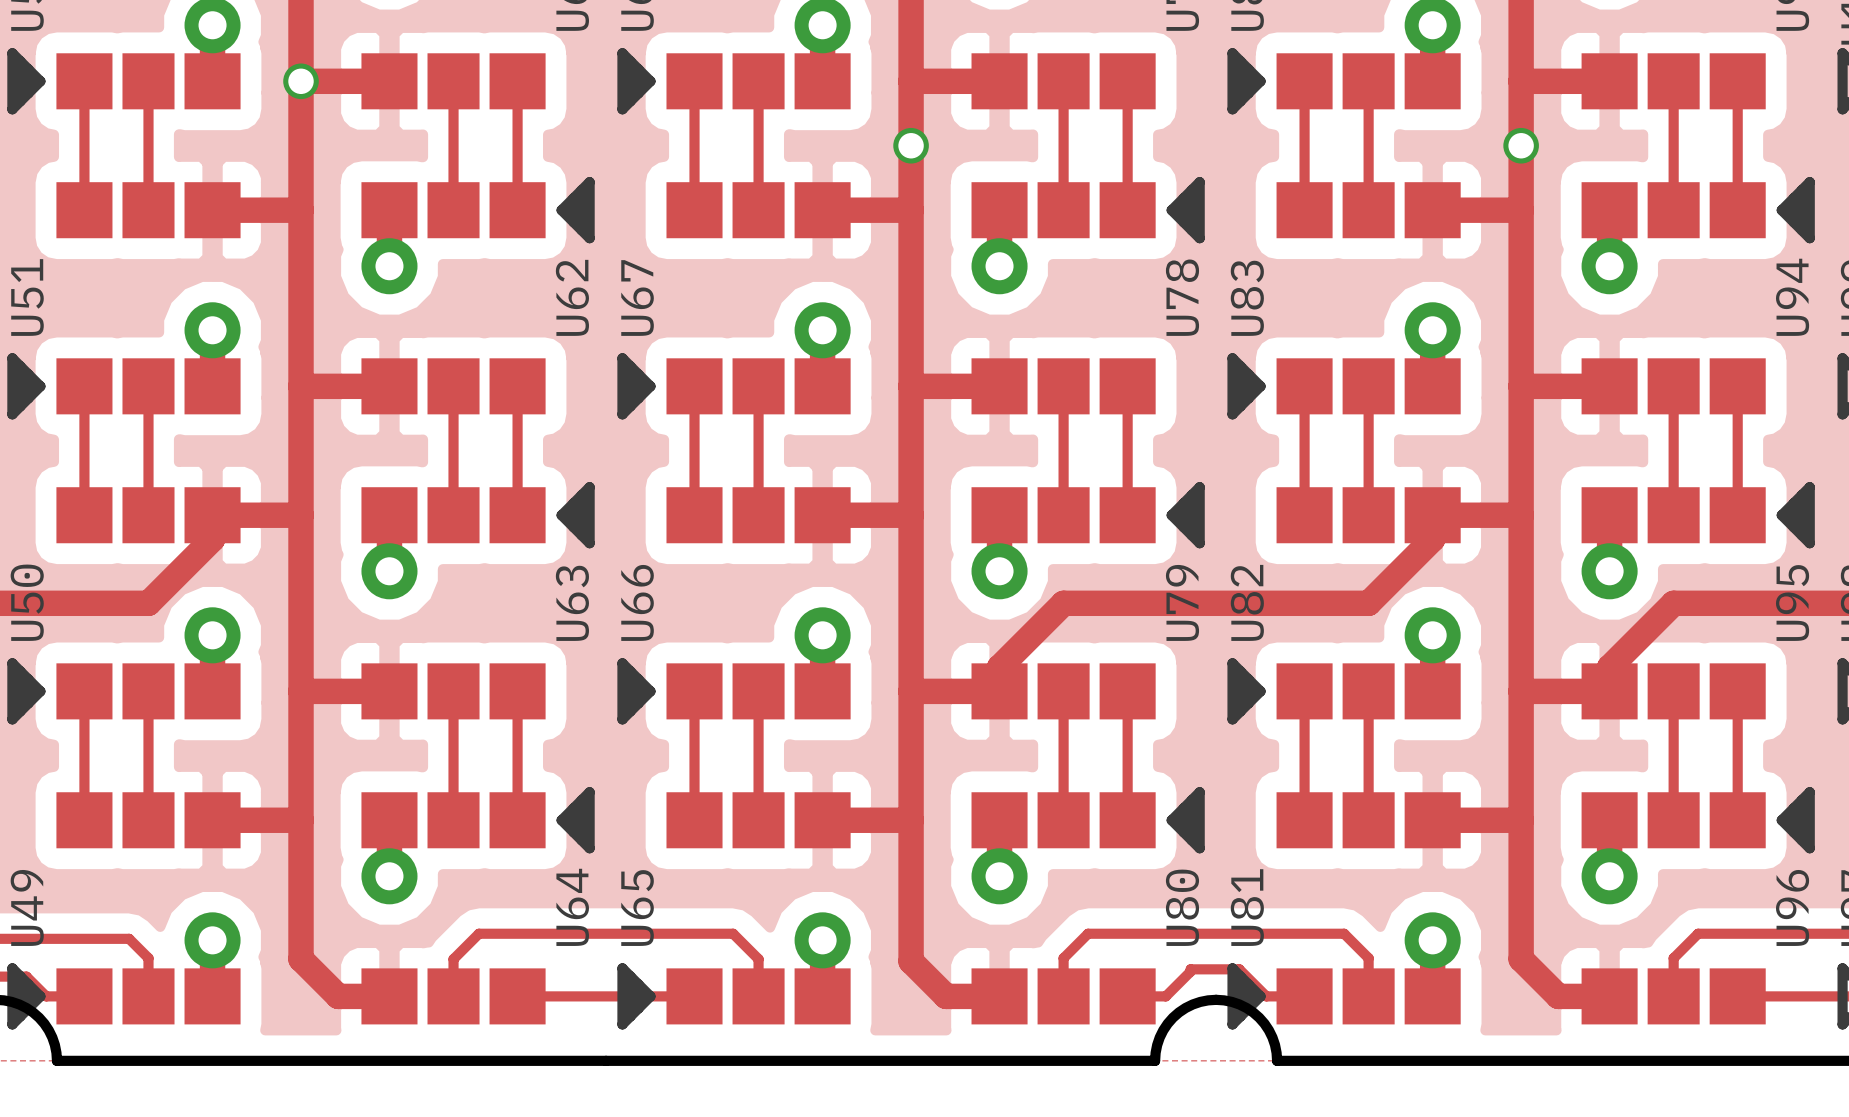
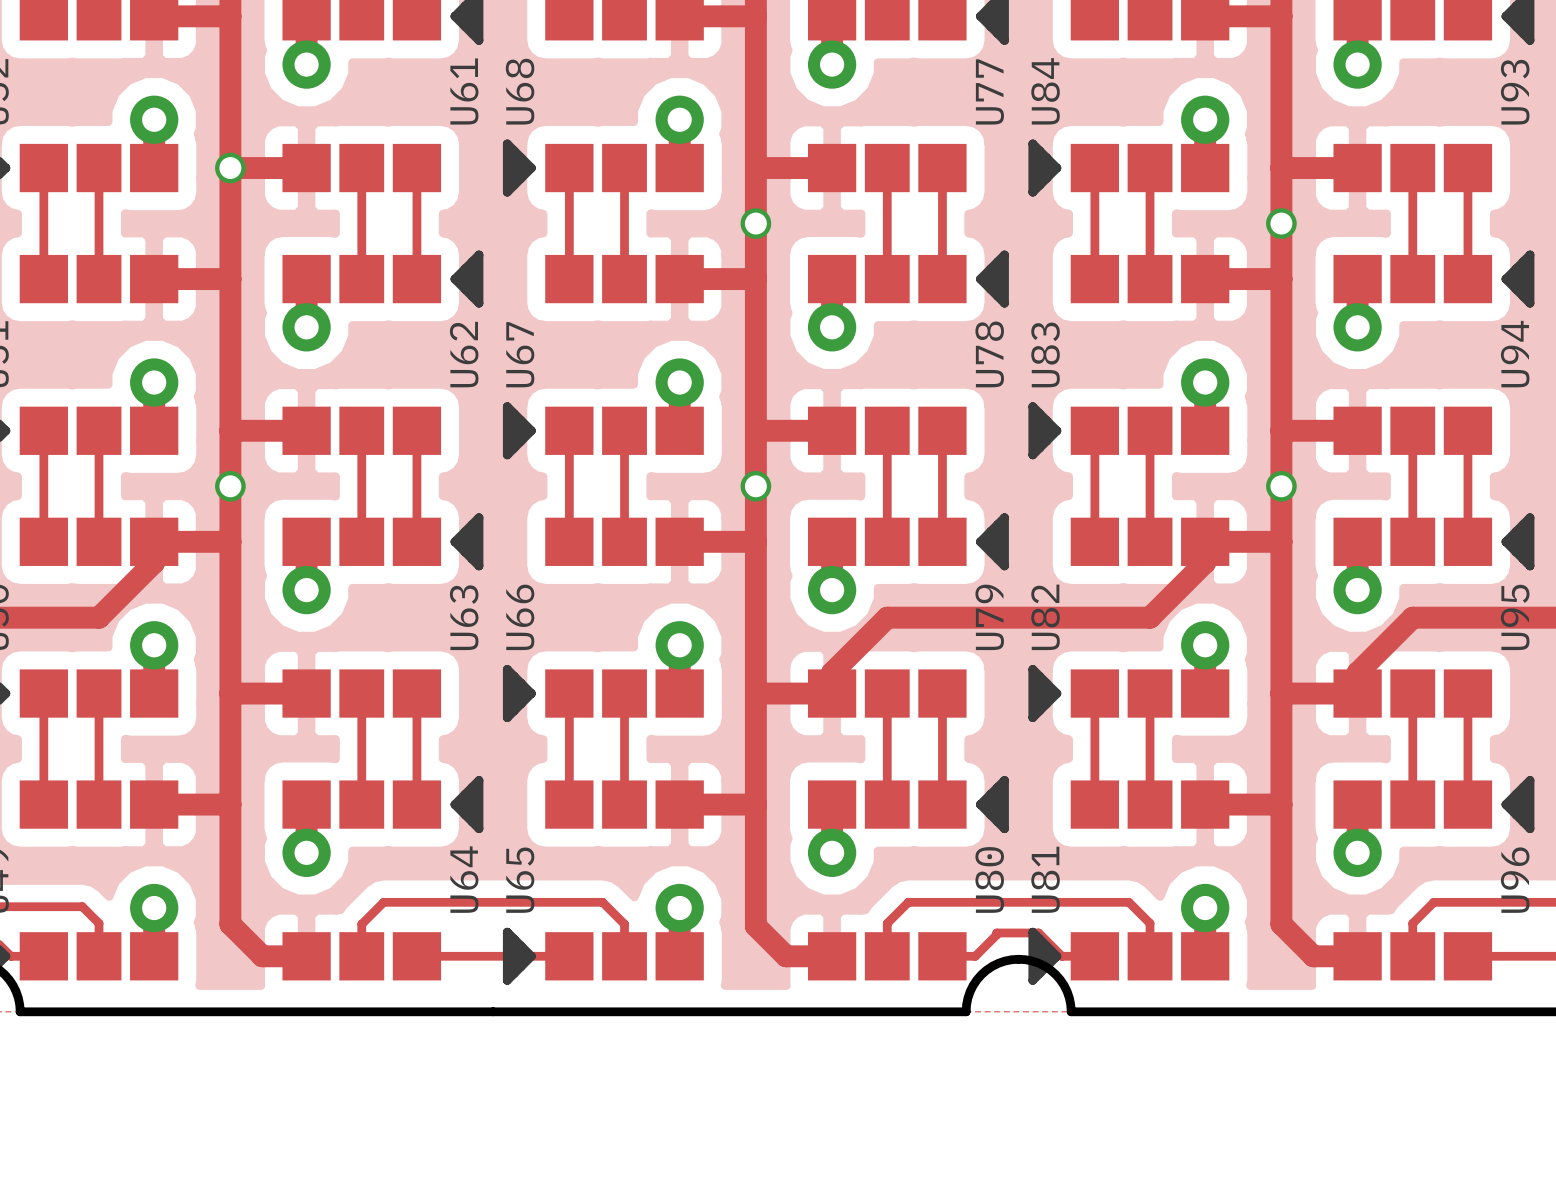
via: none -> (230, 486)
via: none -> (755, 486)
via: none -> (1281, 486)

